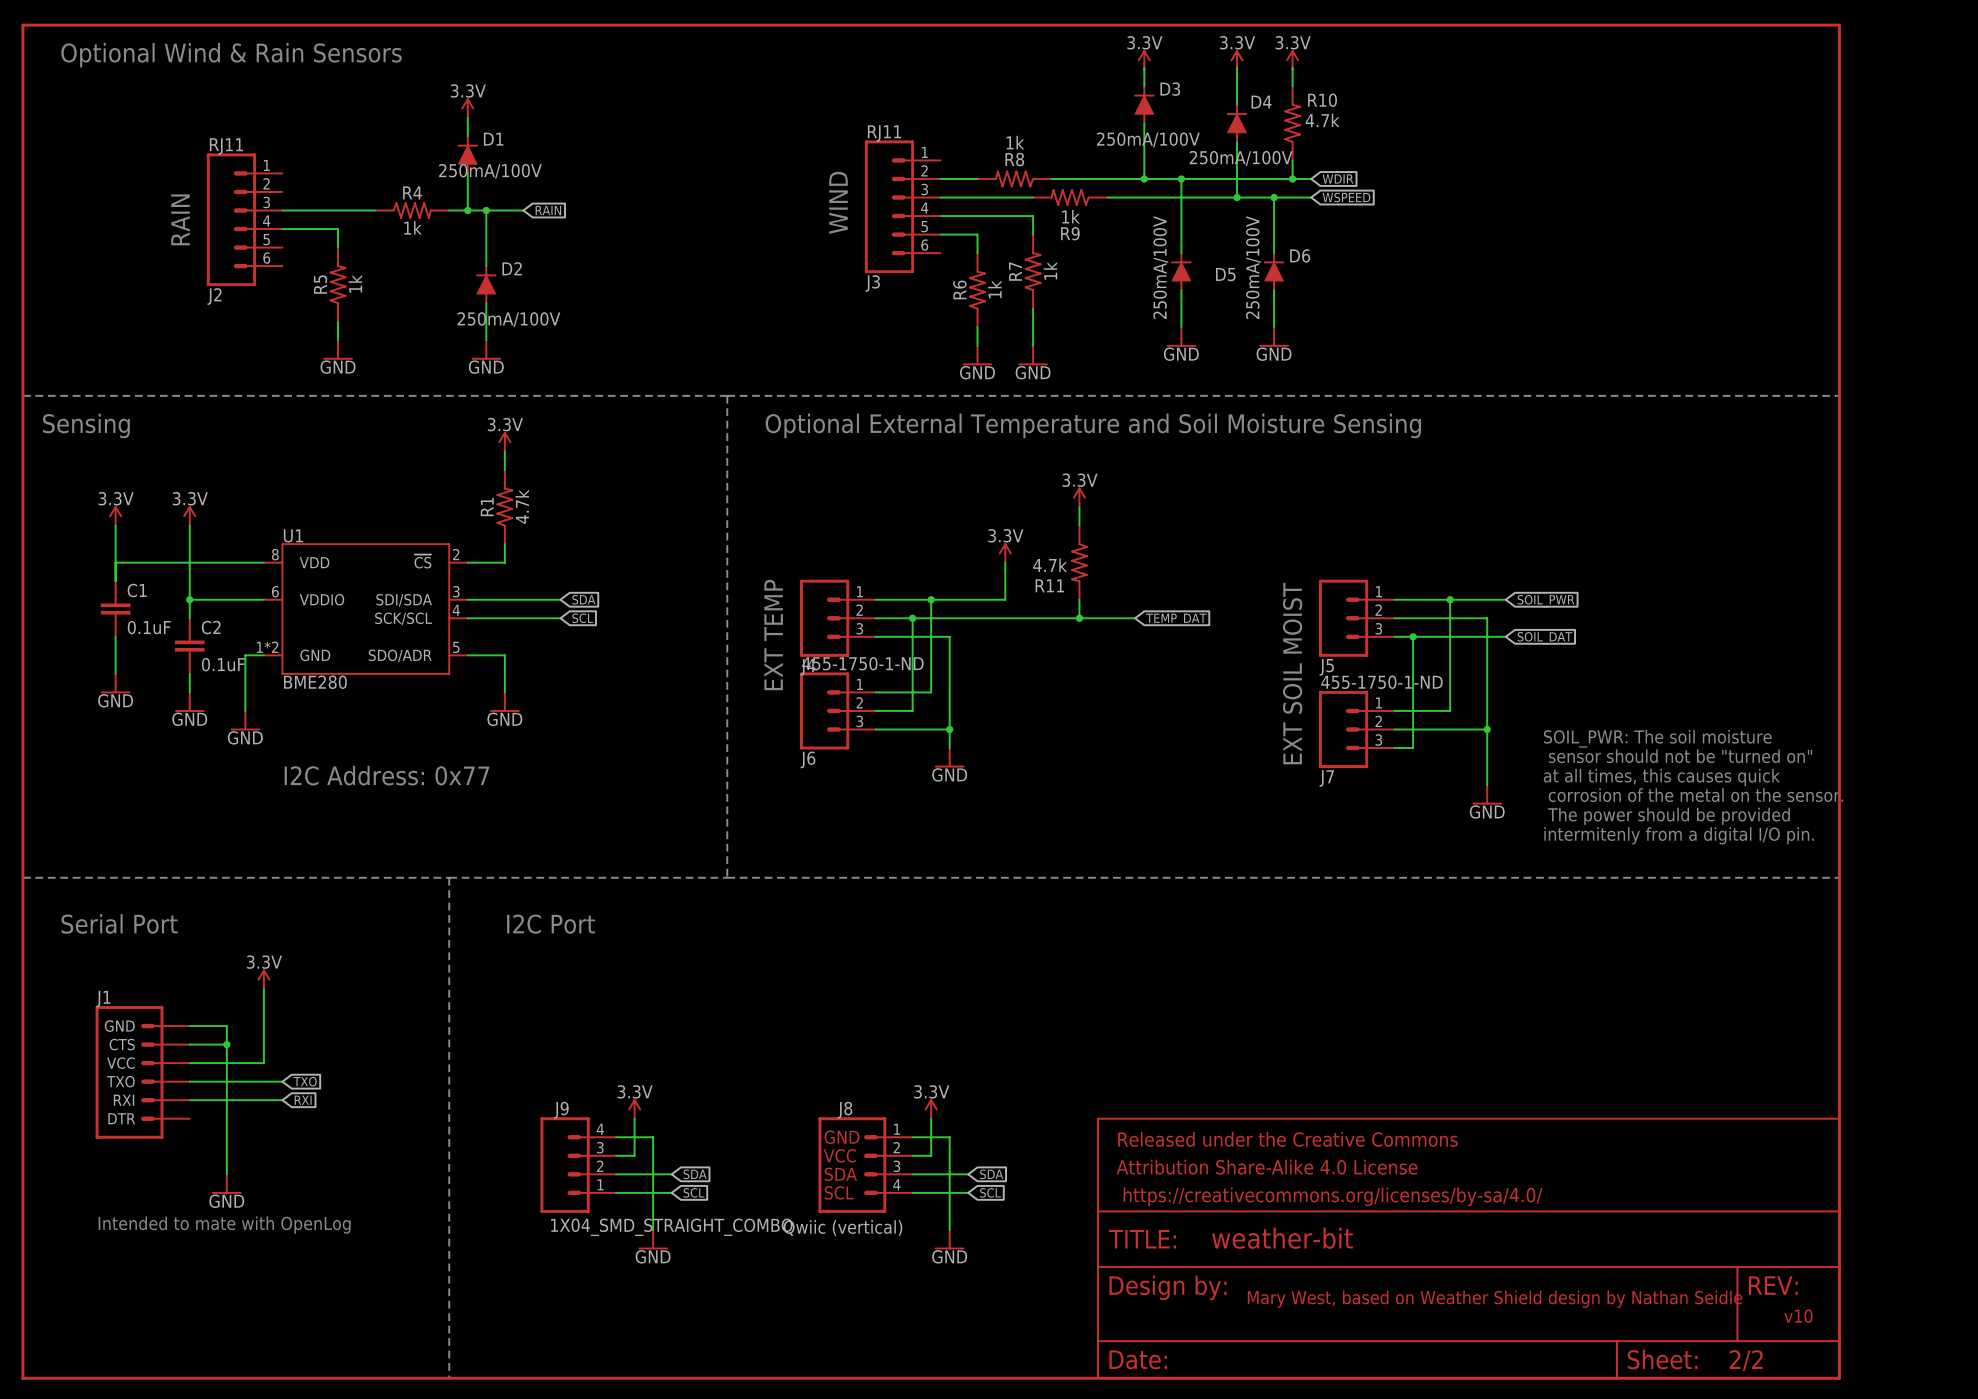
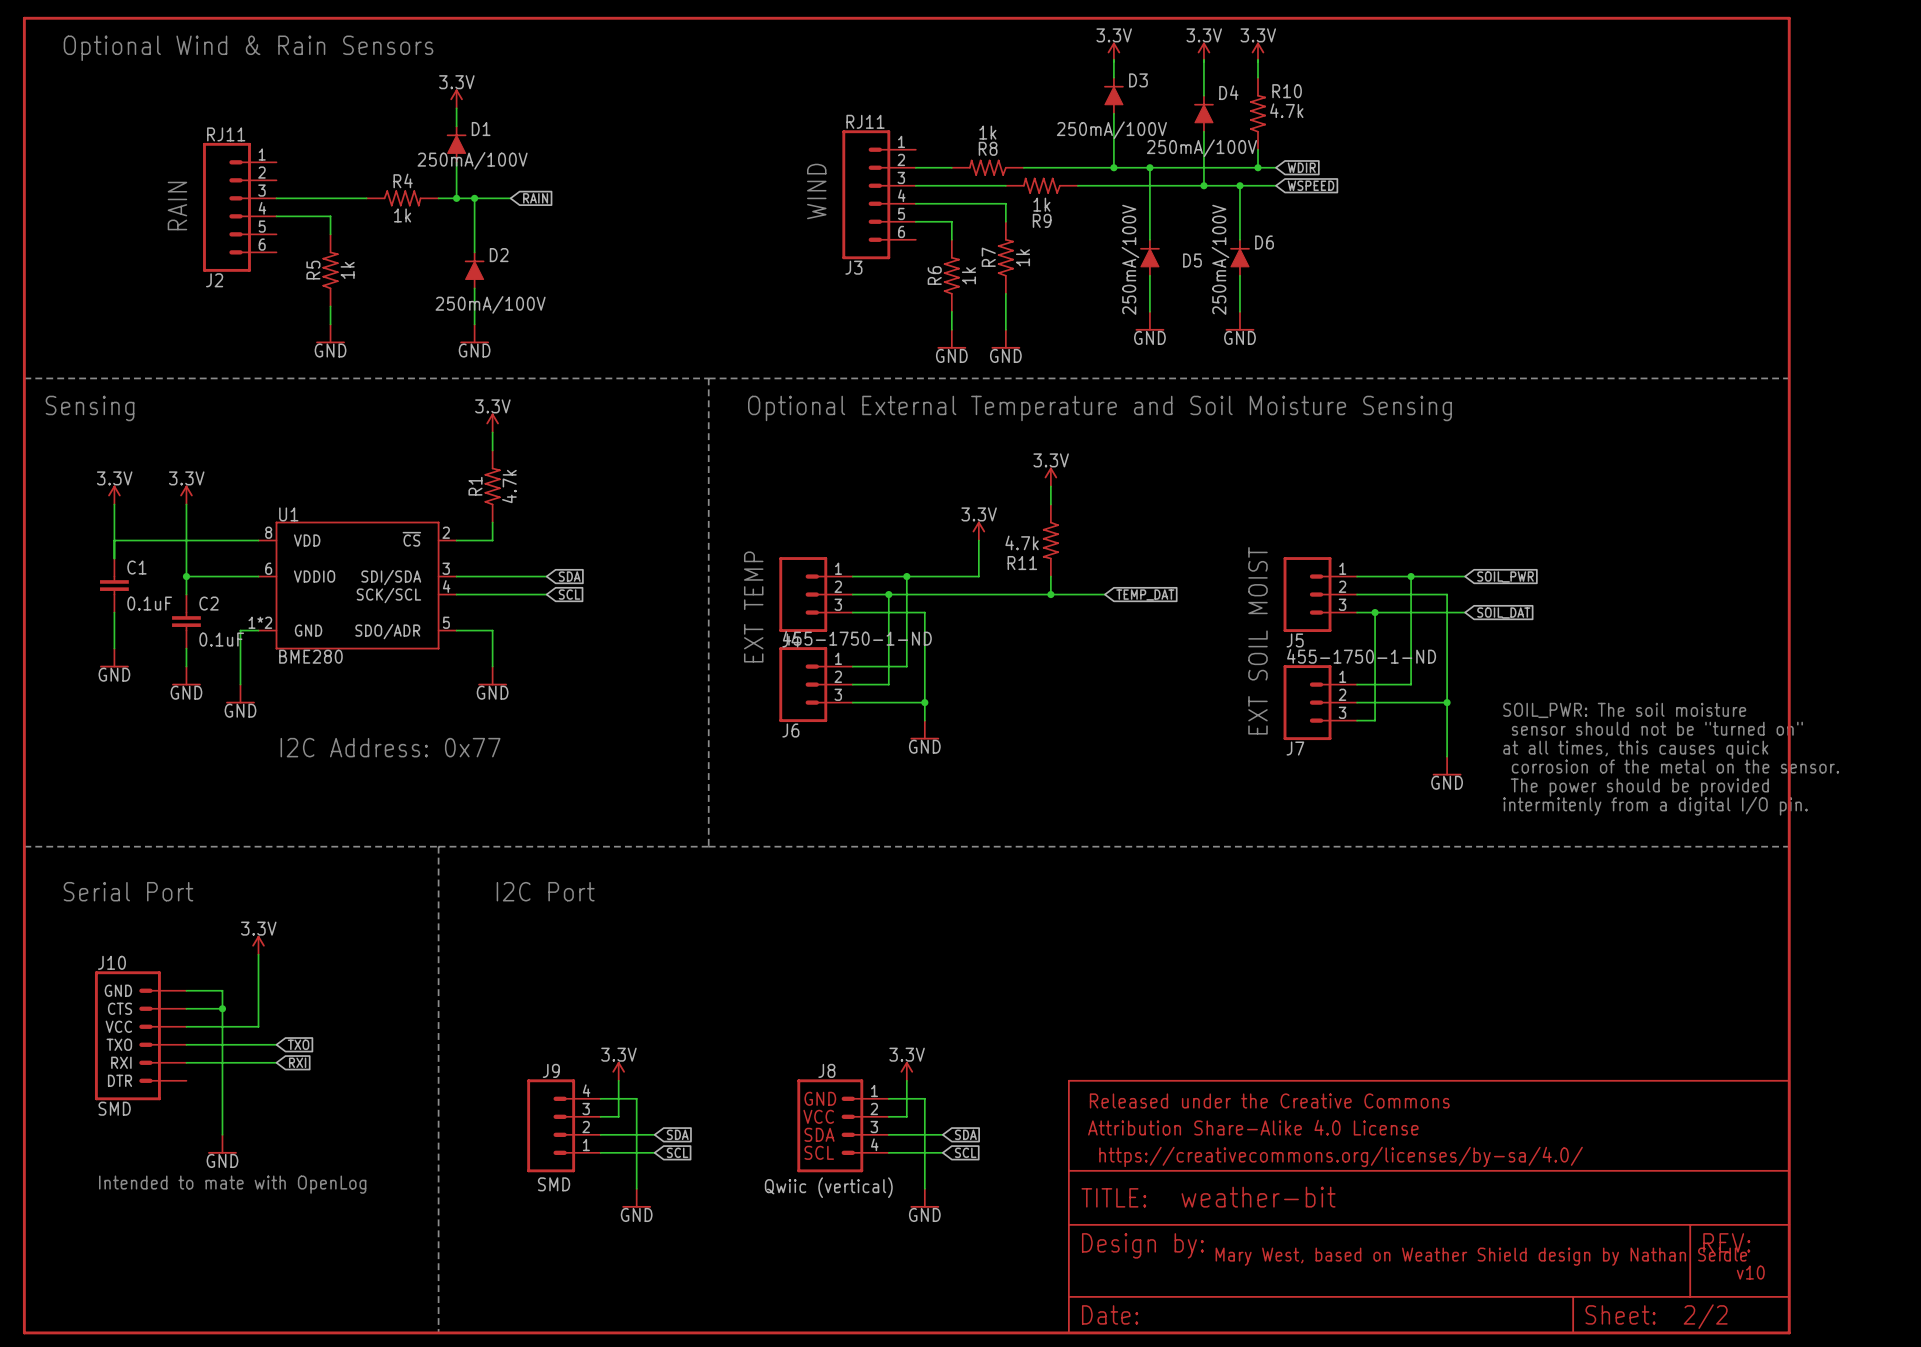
J1 name: J1 (103, 999) -> J10 (111, 962)
J1 value: none -> SMD (114, 1108)
J9 value: 1X04_SMD_STRAIGHT_COMBO (671, 1227) -> SMD (554, 1184)

